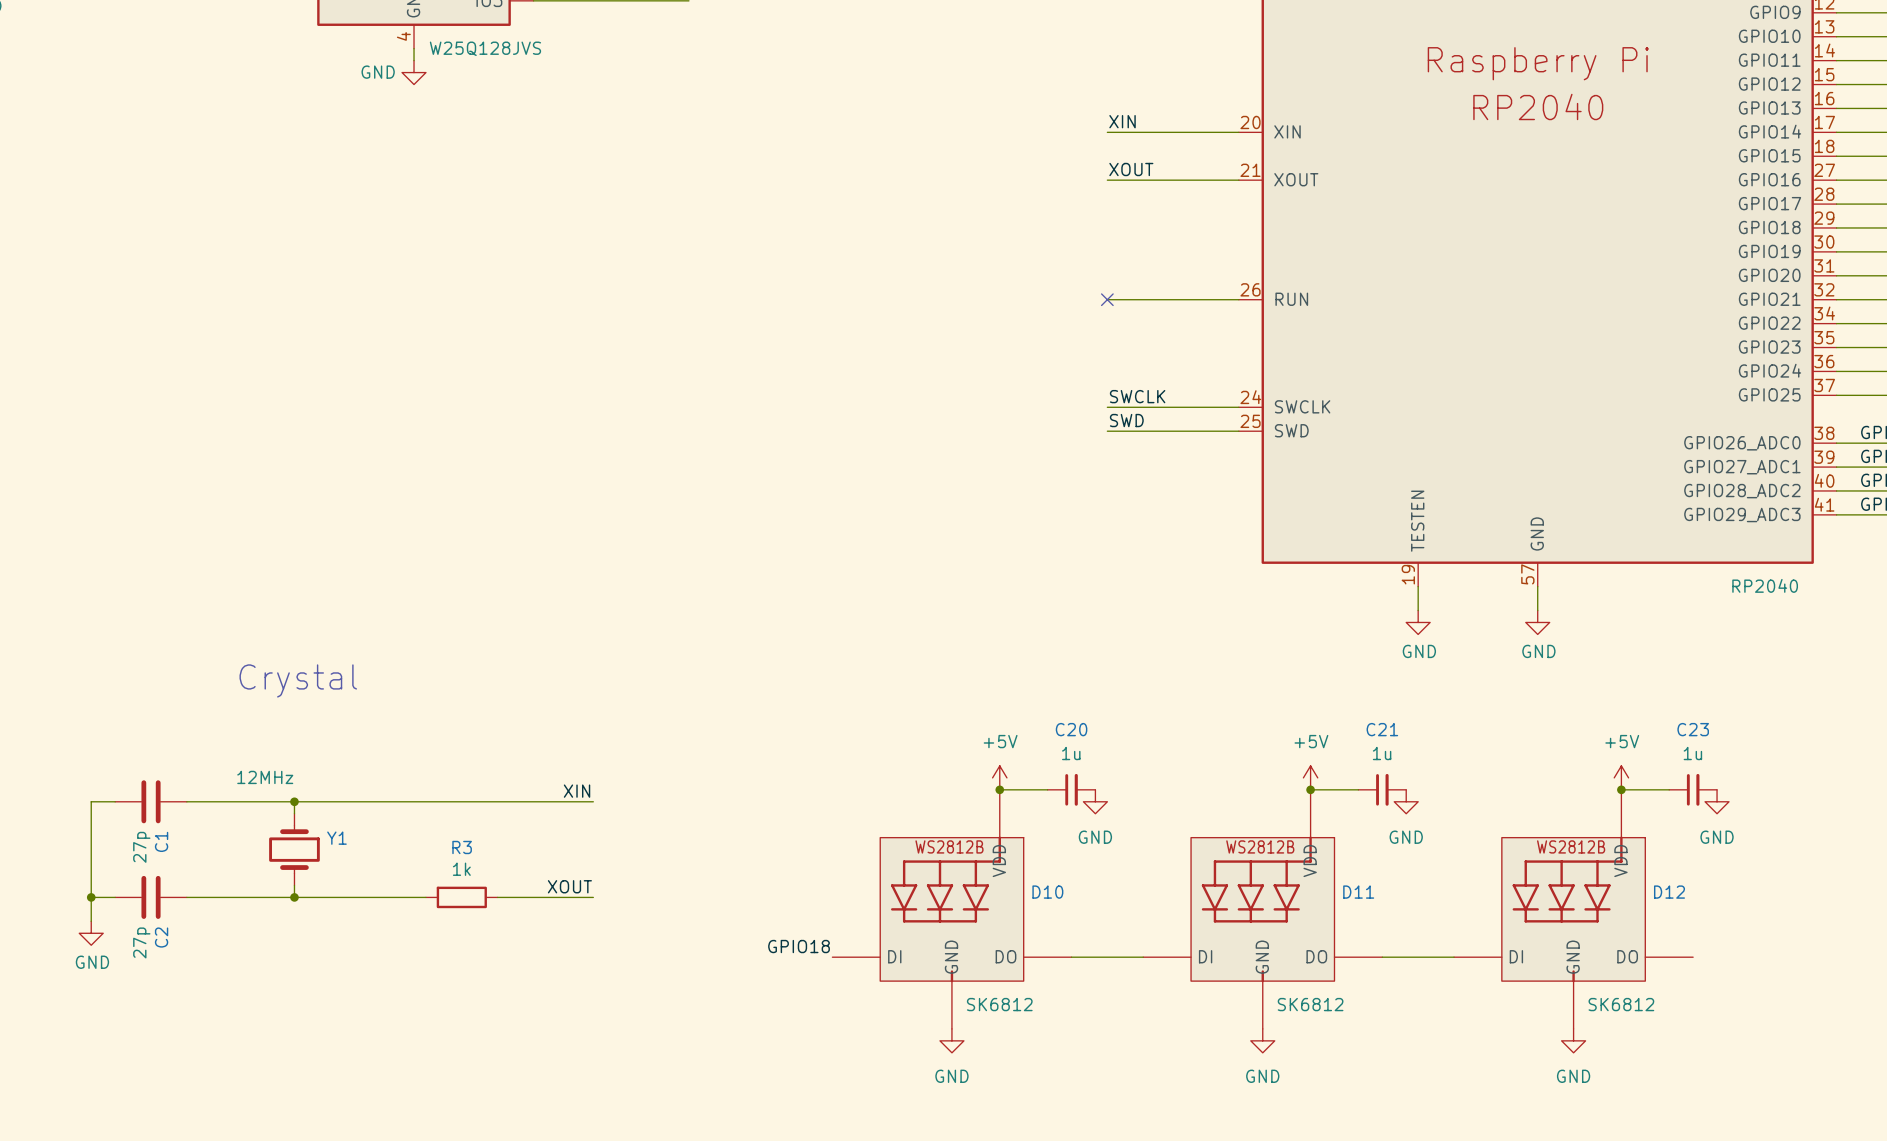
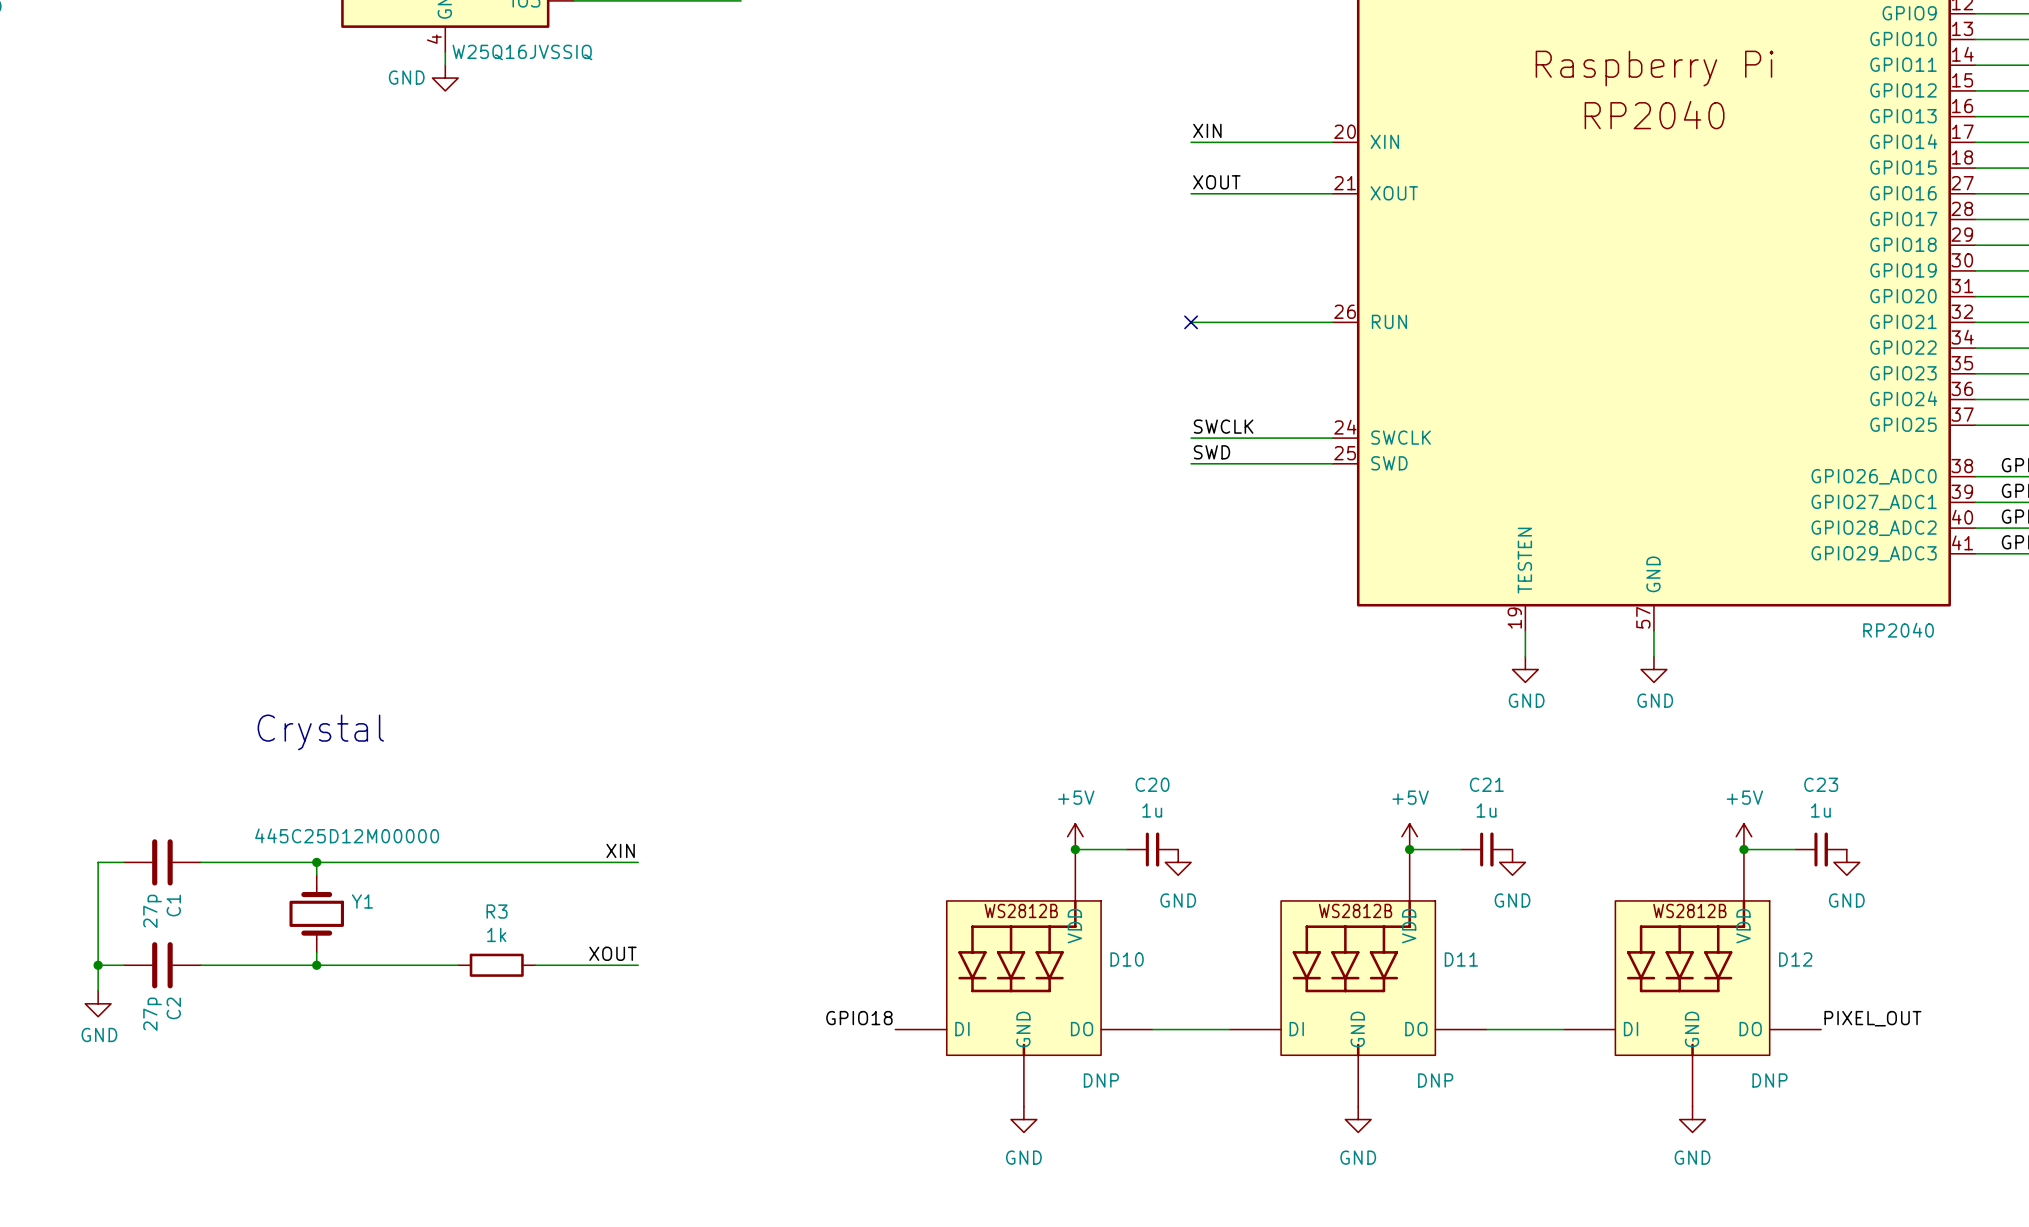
part value: W25Q128JVS (485, 48) -> W25Q16JVSSIQ (522, 52)
Y1 value: 12MHz (265, 777) -> 445C25D12M00000 (347, 835)
label: none -> PIXEL_OUT (1872, 1018)
D10 value: SK6812 (999, 1004) -> DNP (1101, 1080)
D11 value: SK6812 (1310, 1004) -> DNP (1435, 1080)
D12 value: SK6812 (1621, 1004) -> DNP (1769, 1080)

